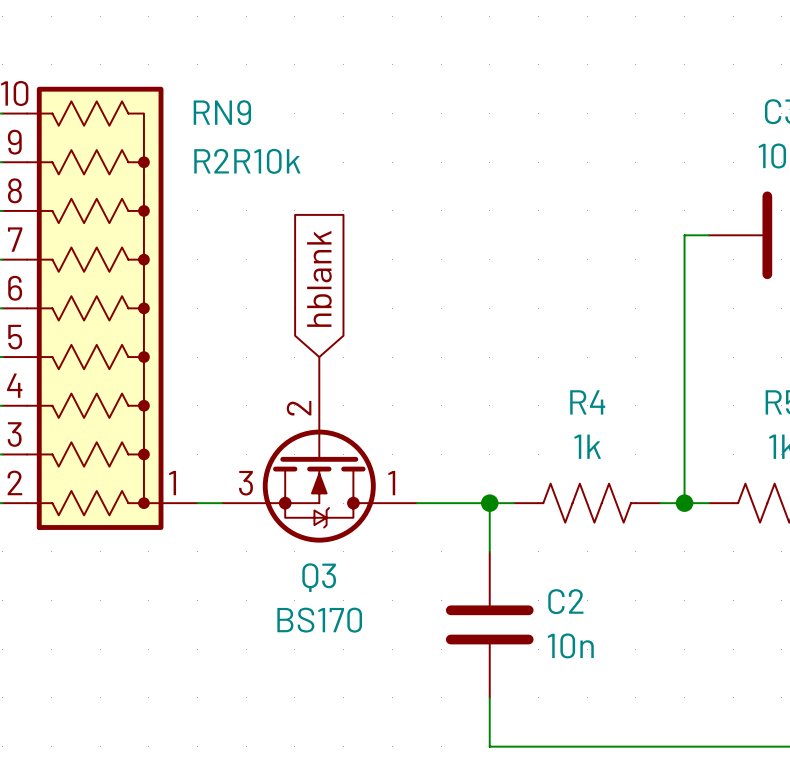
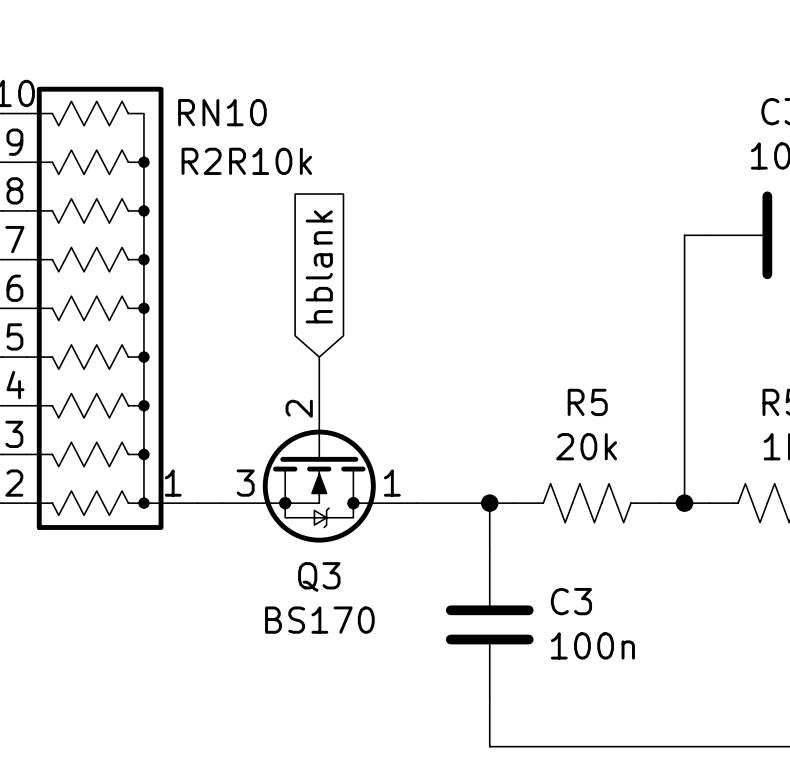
RN9 name: RN9 (222, 112) -> RN10 (222, 112)
R4 name: R4 (587, 402) -> R5 (587, 402)
R4 value: 1k (587, 446) -> 20k (586, 446)
C2 name: C2 (565, 601) -> C3 (571, 601)
C2 value: 10n (570, 645) -> 100n (592, 645)

